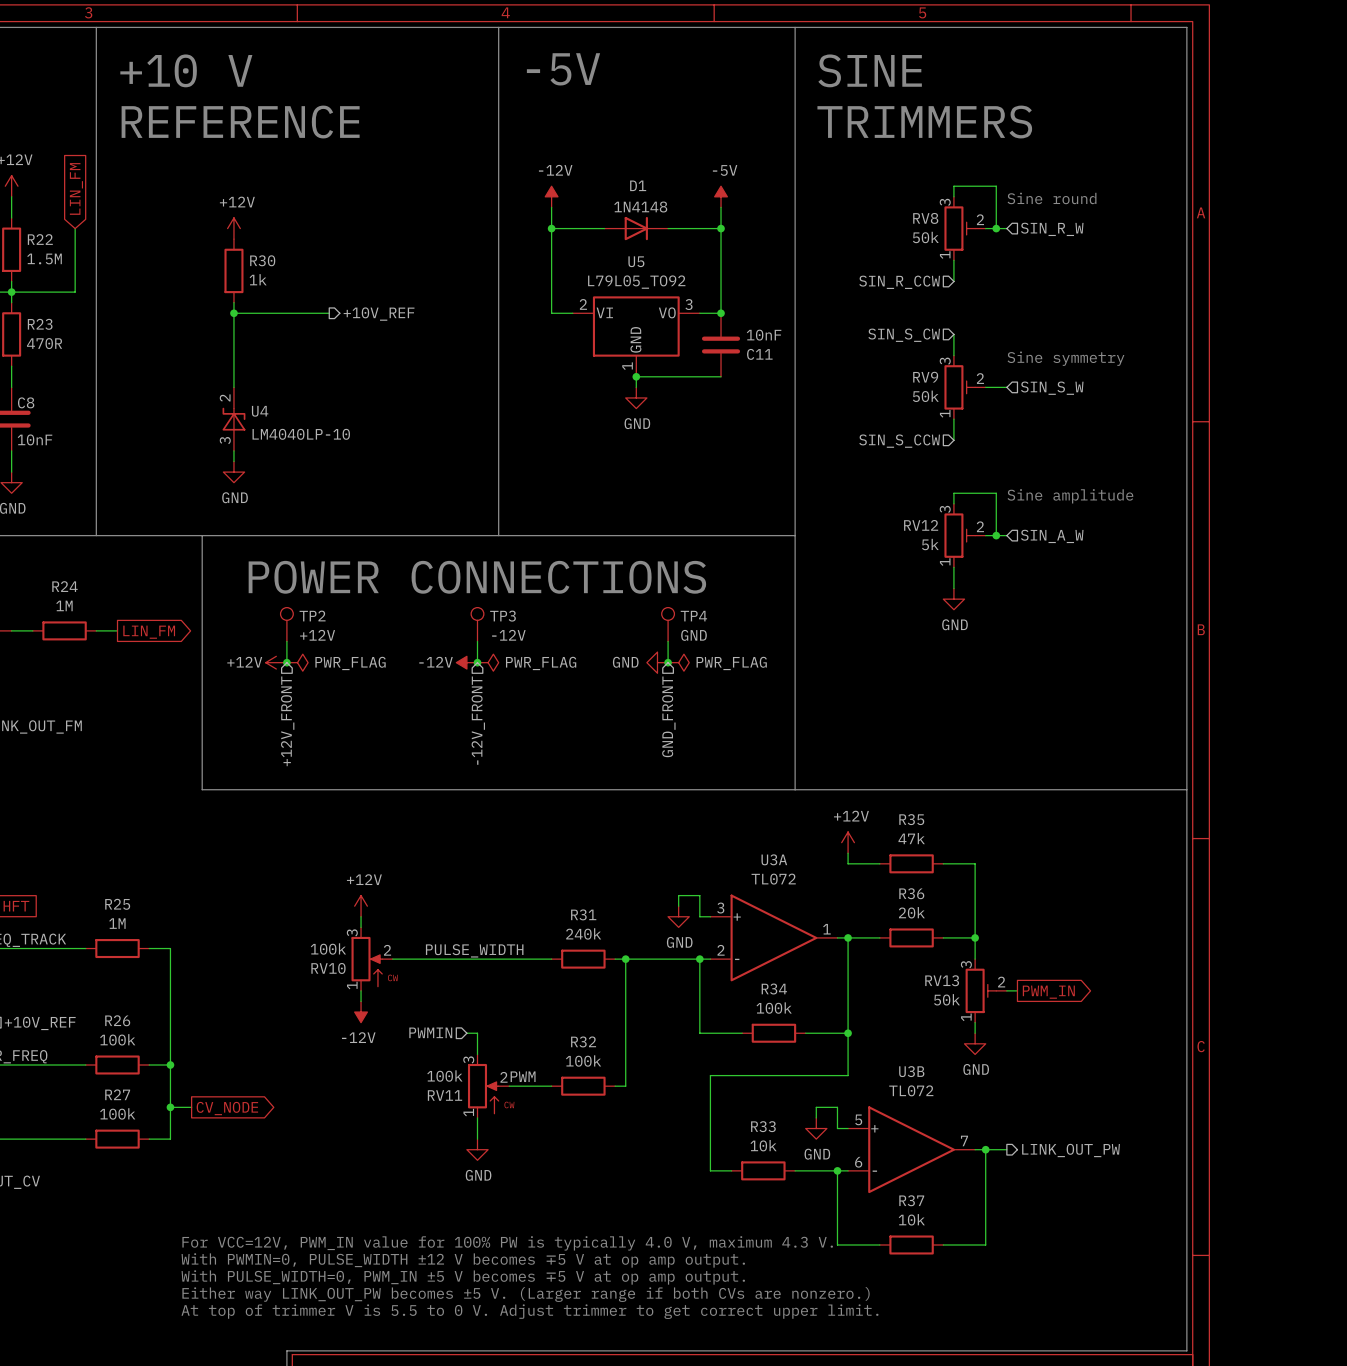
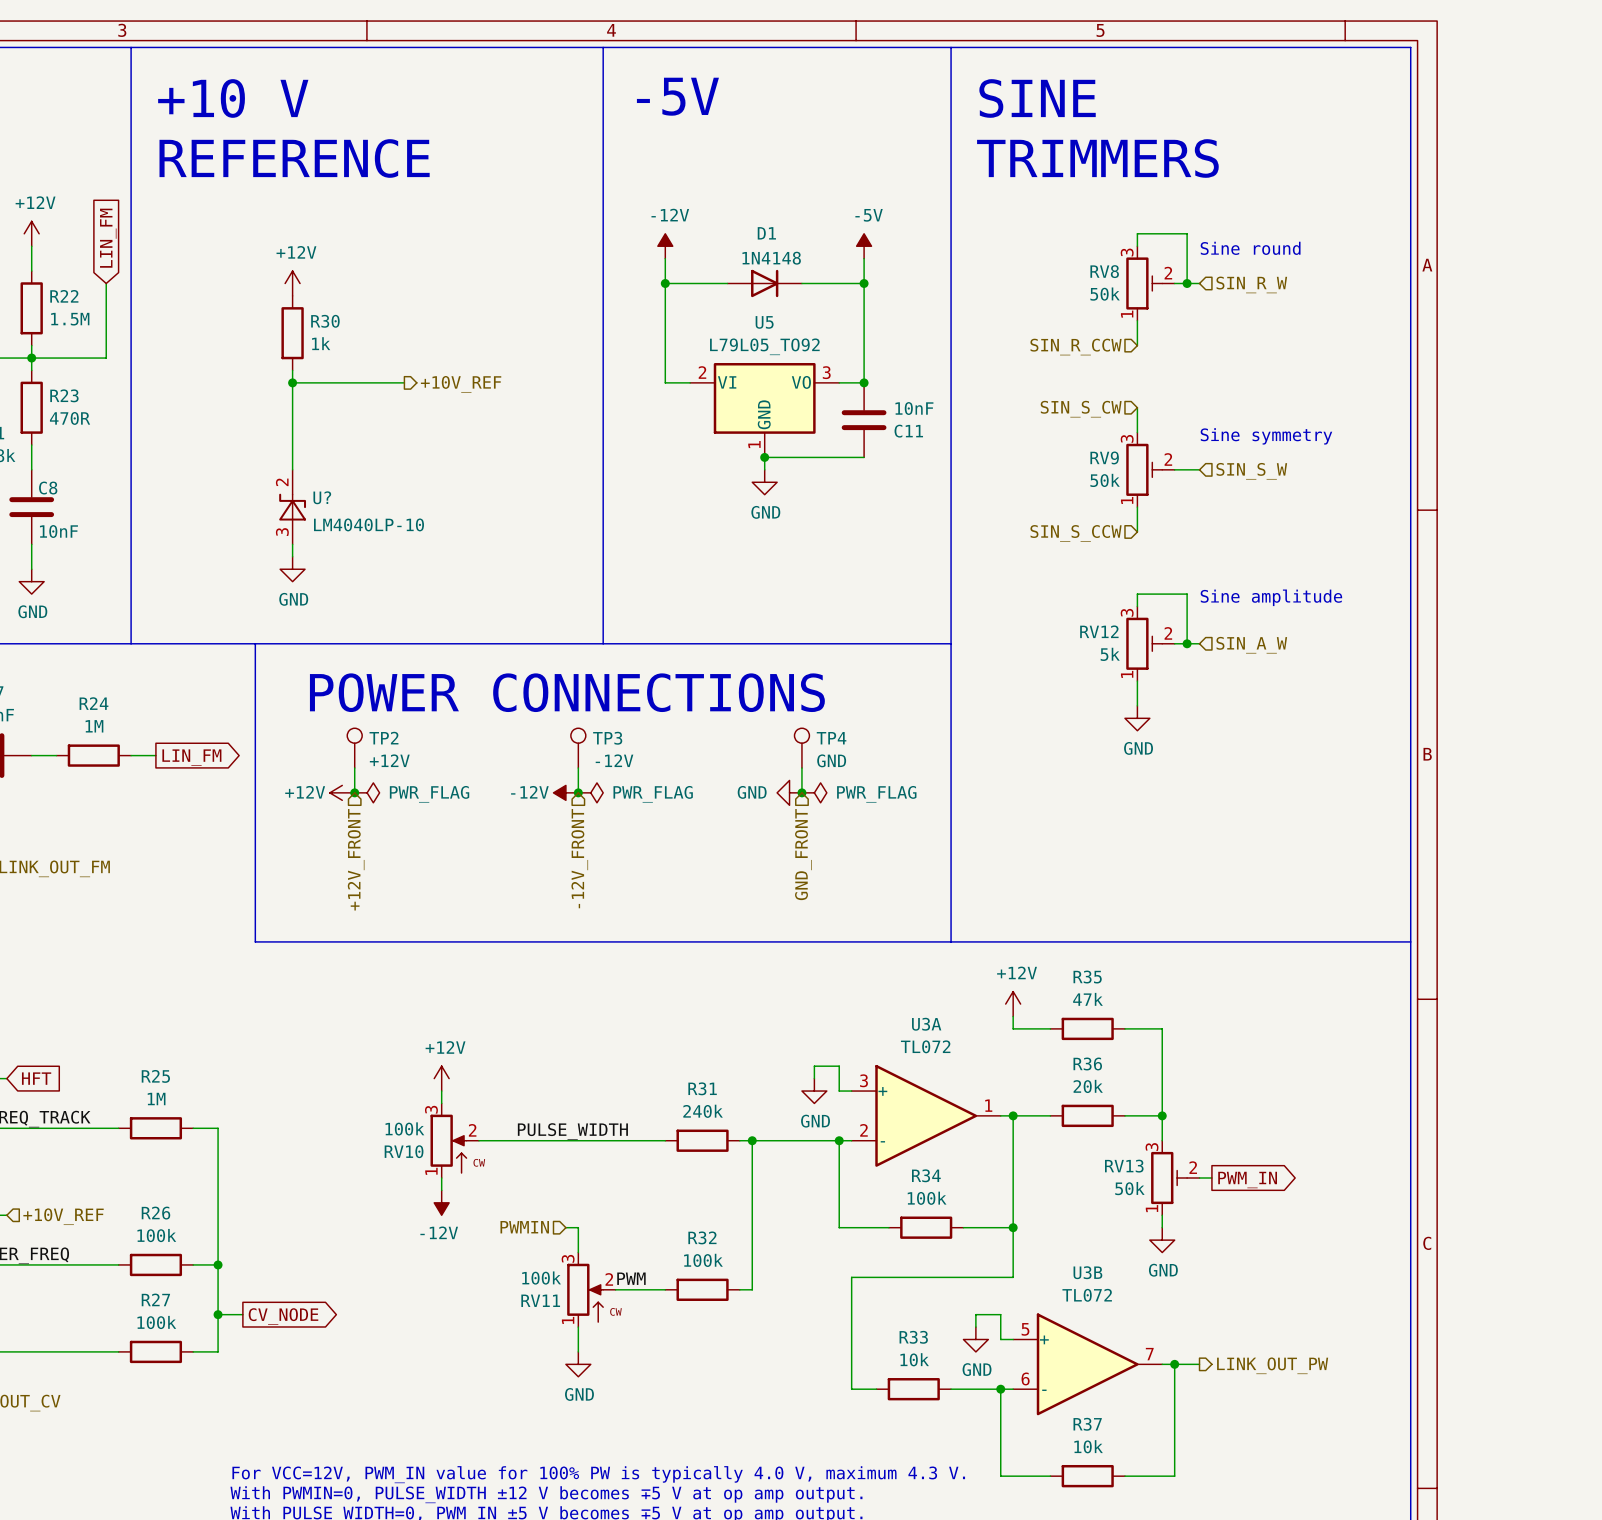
U4 name: U4 (260, 411) -> U? (322, 497)

